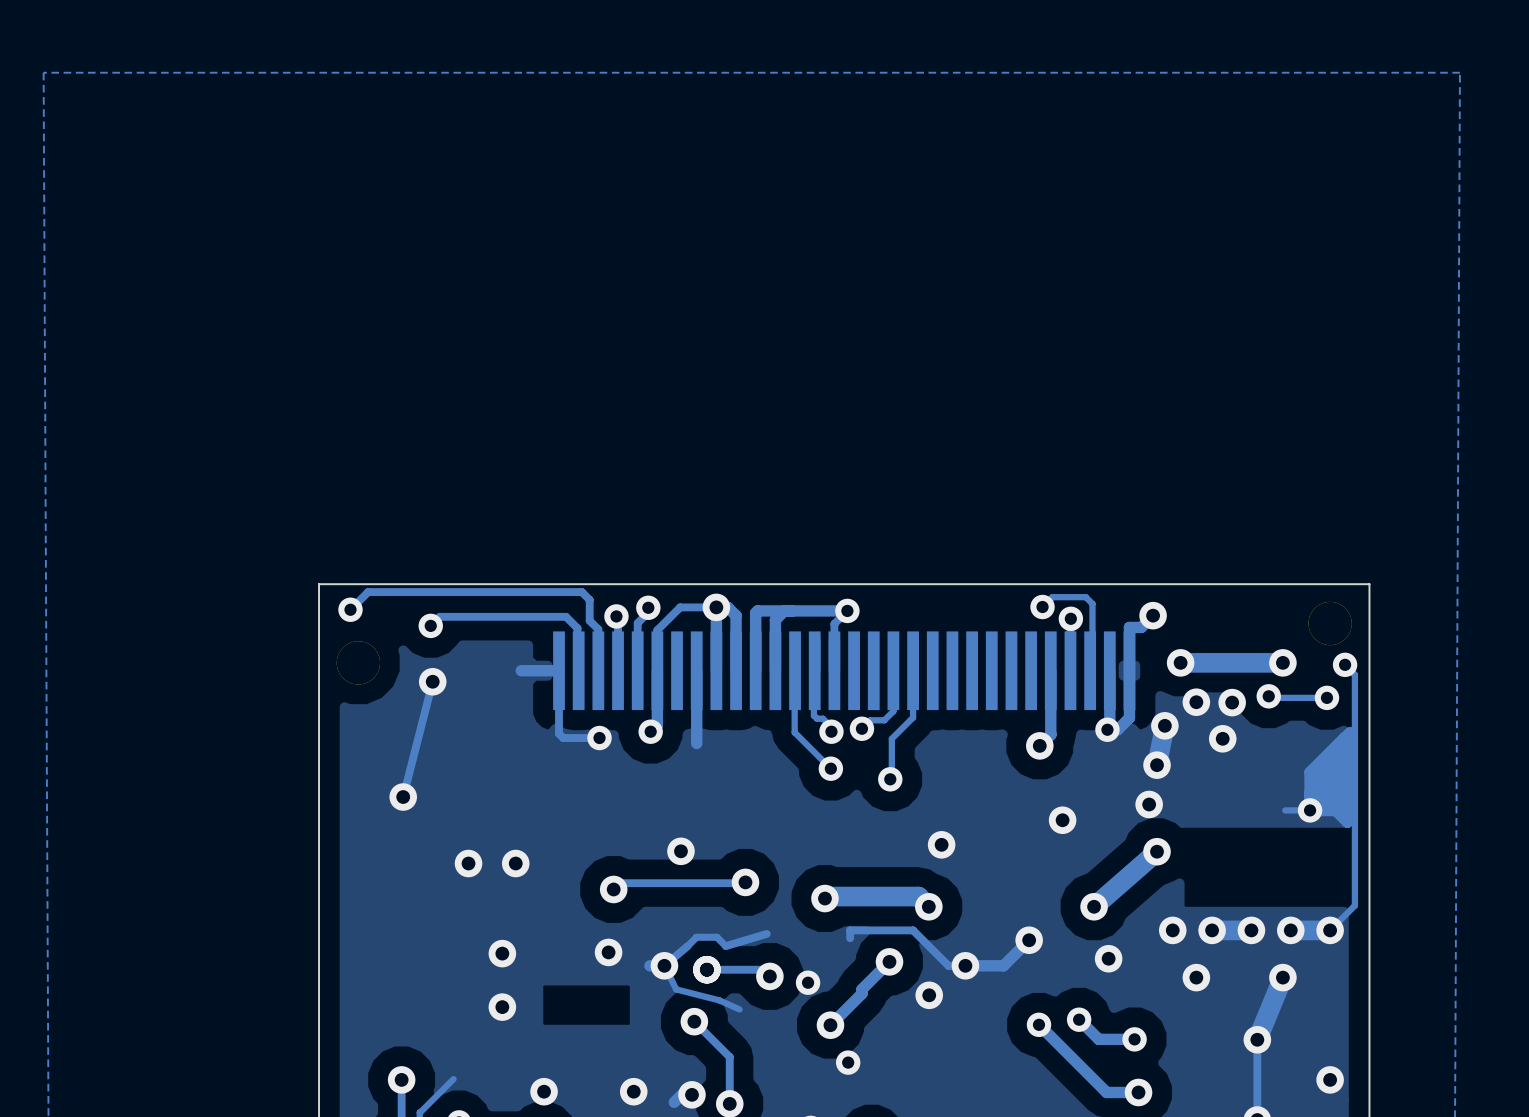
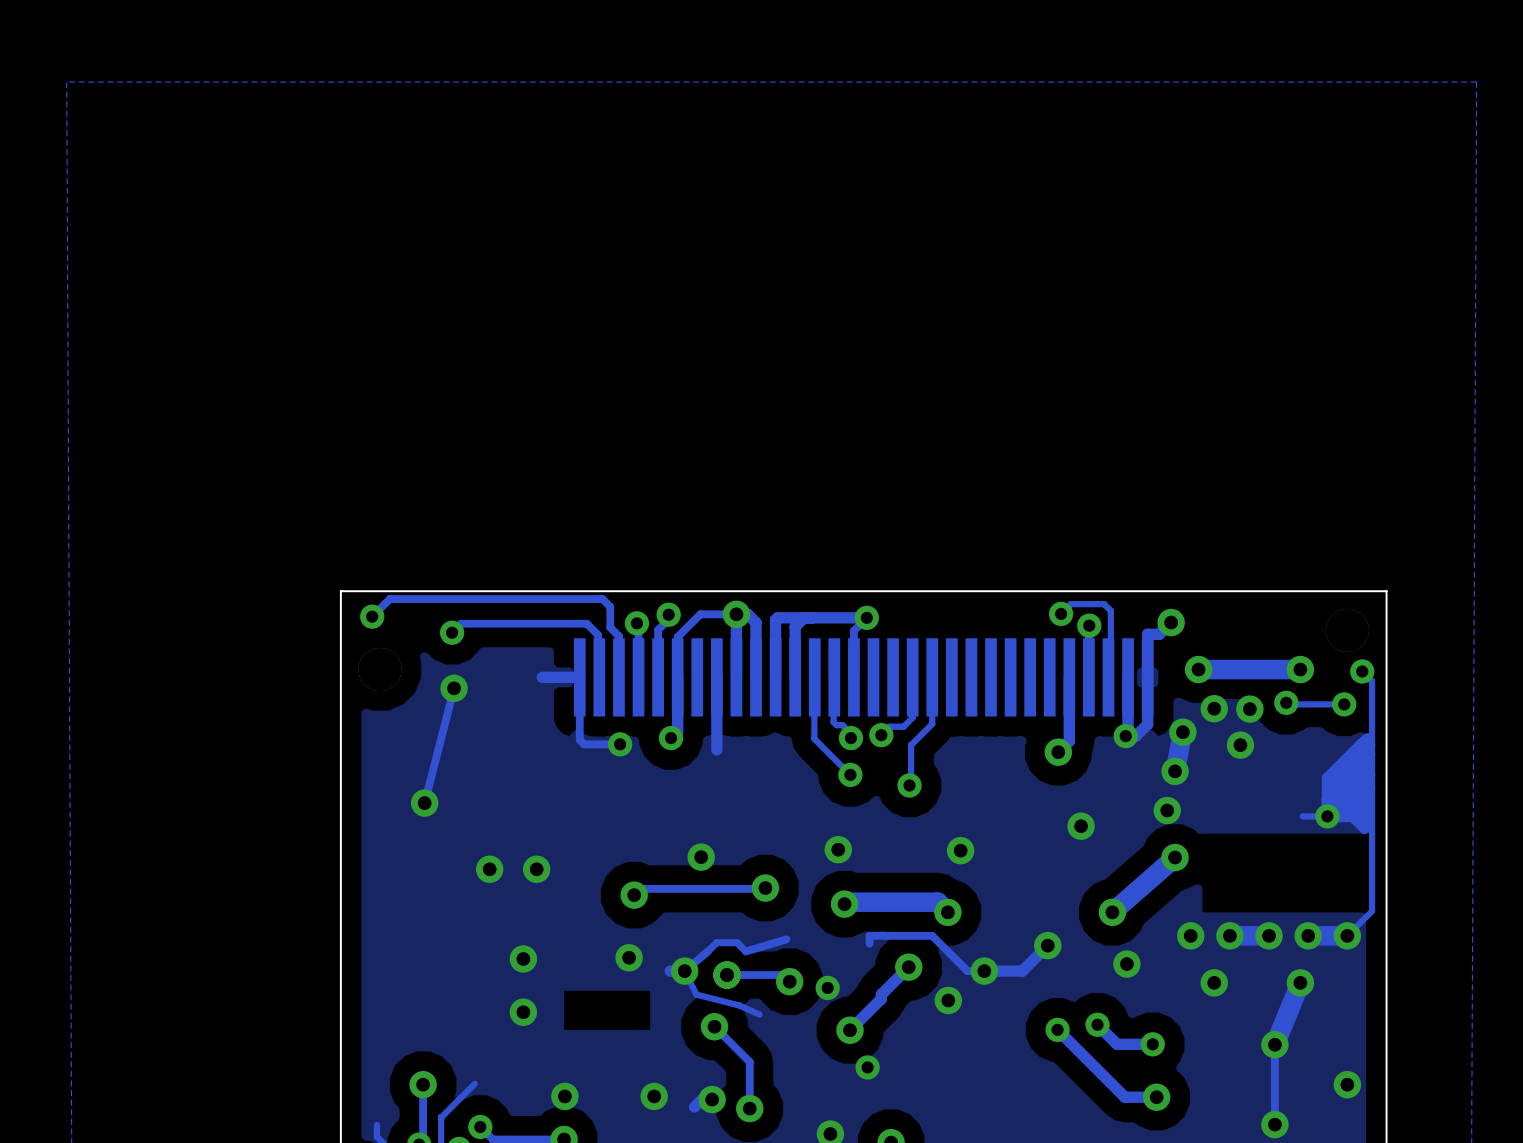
via: none -> (838, 849)

